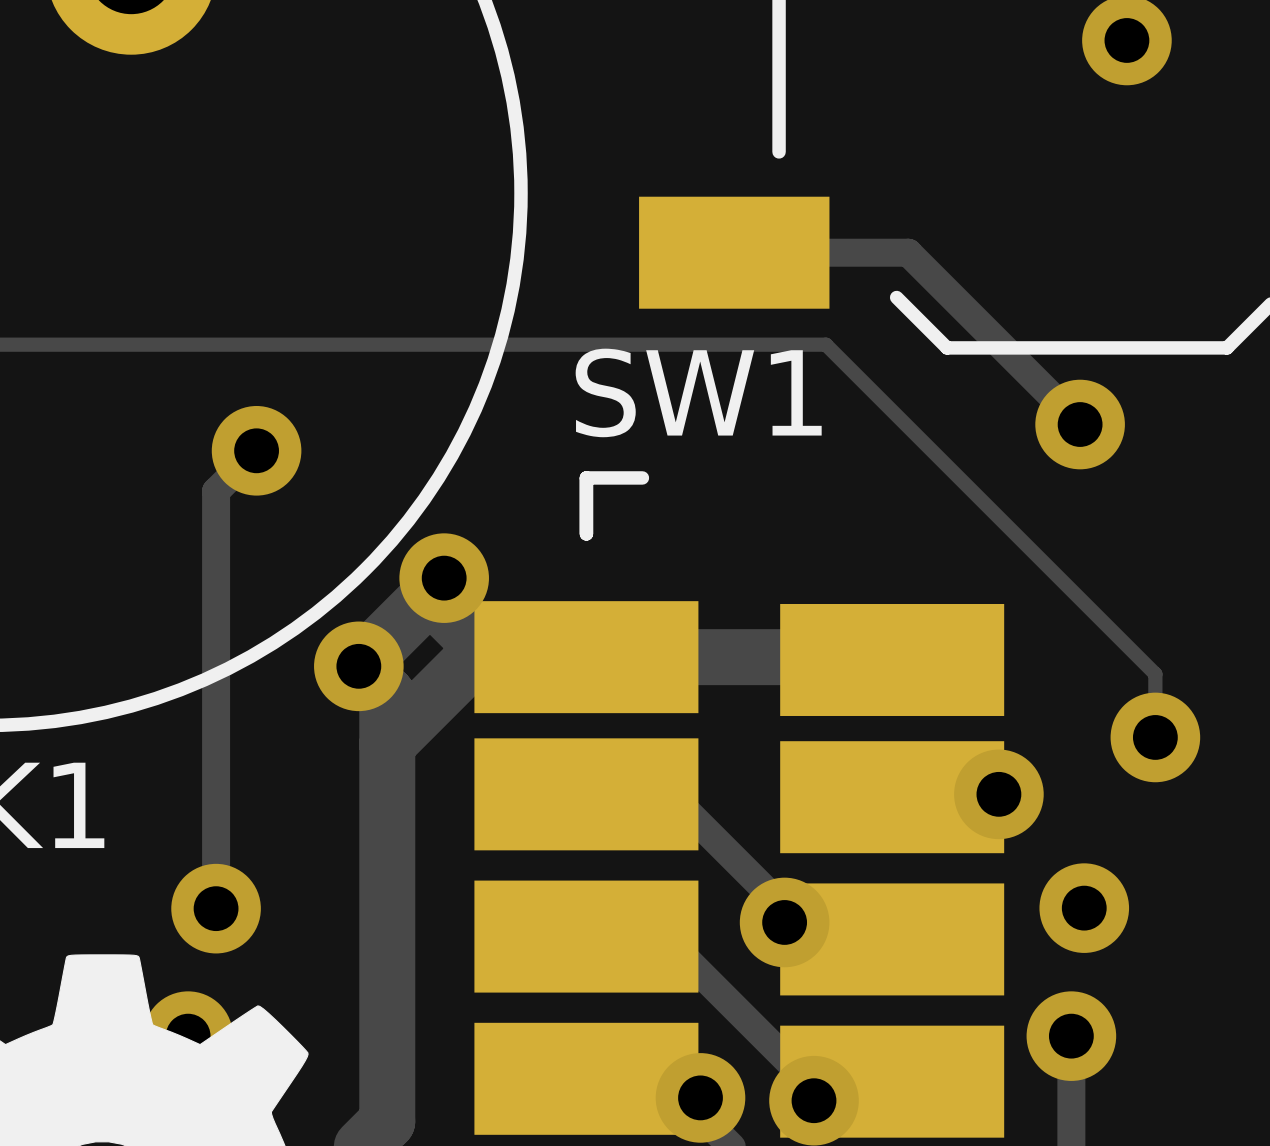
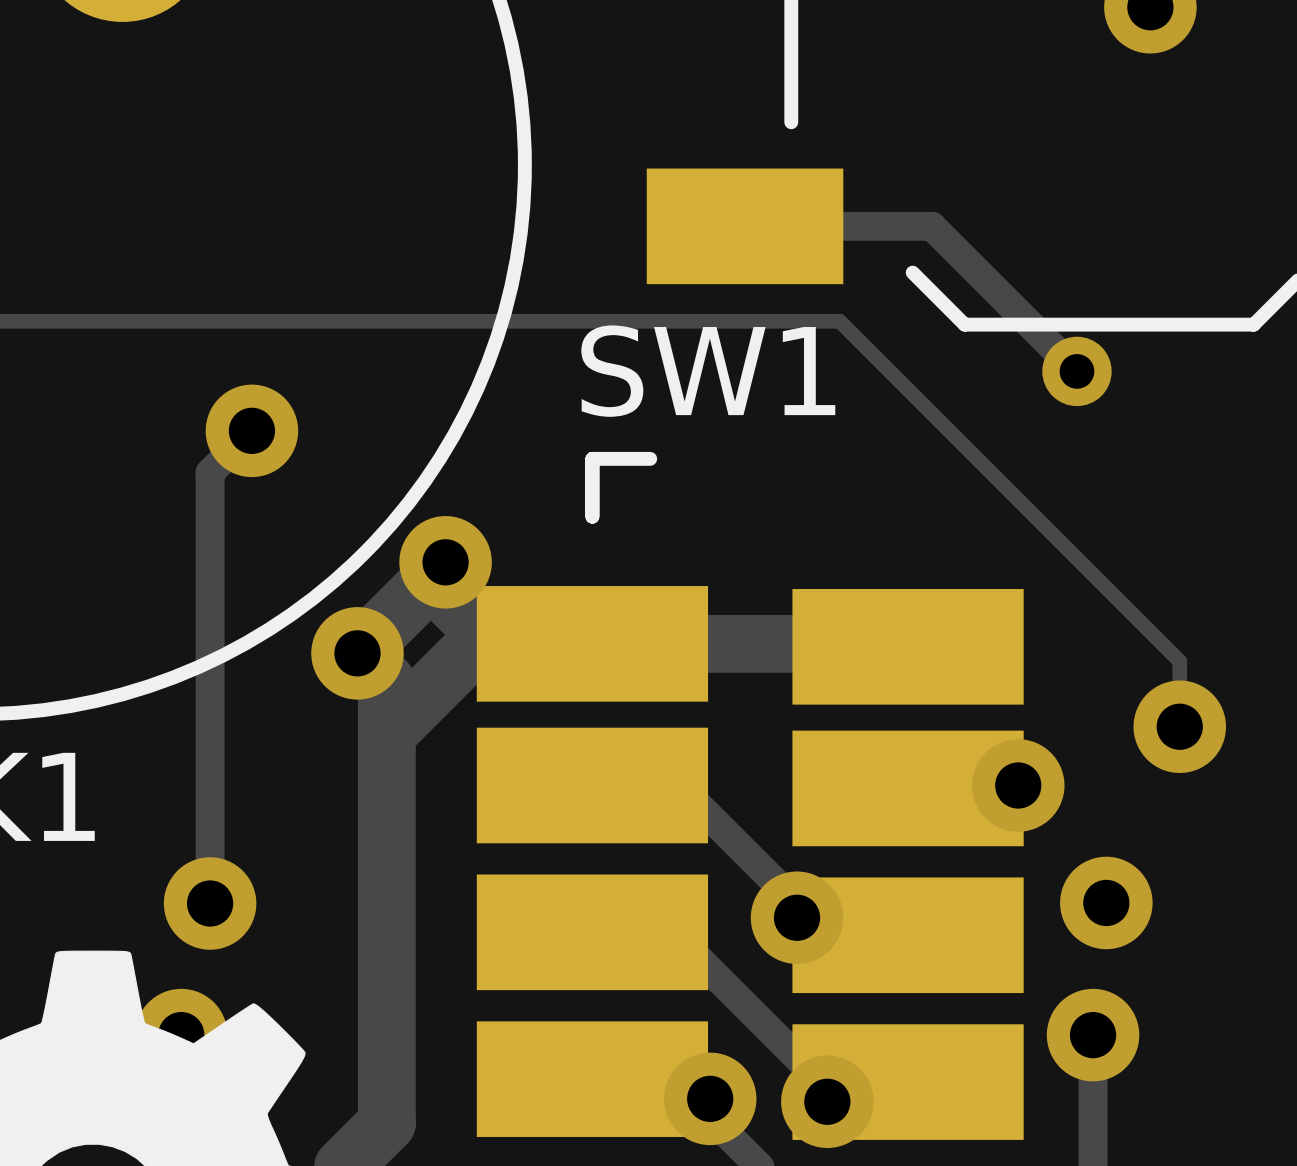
track: (908, 252) (1080, 424) -> (924, 226) (931, 226) (1076, 371)
via size: [1035, 379, 1125, 470] -> [1042, 336, 1112, 407]

